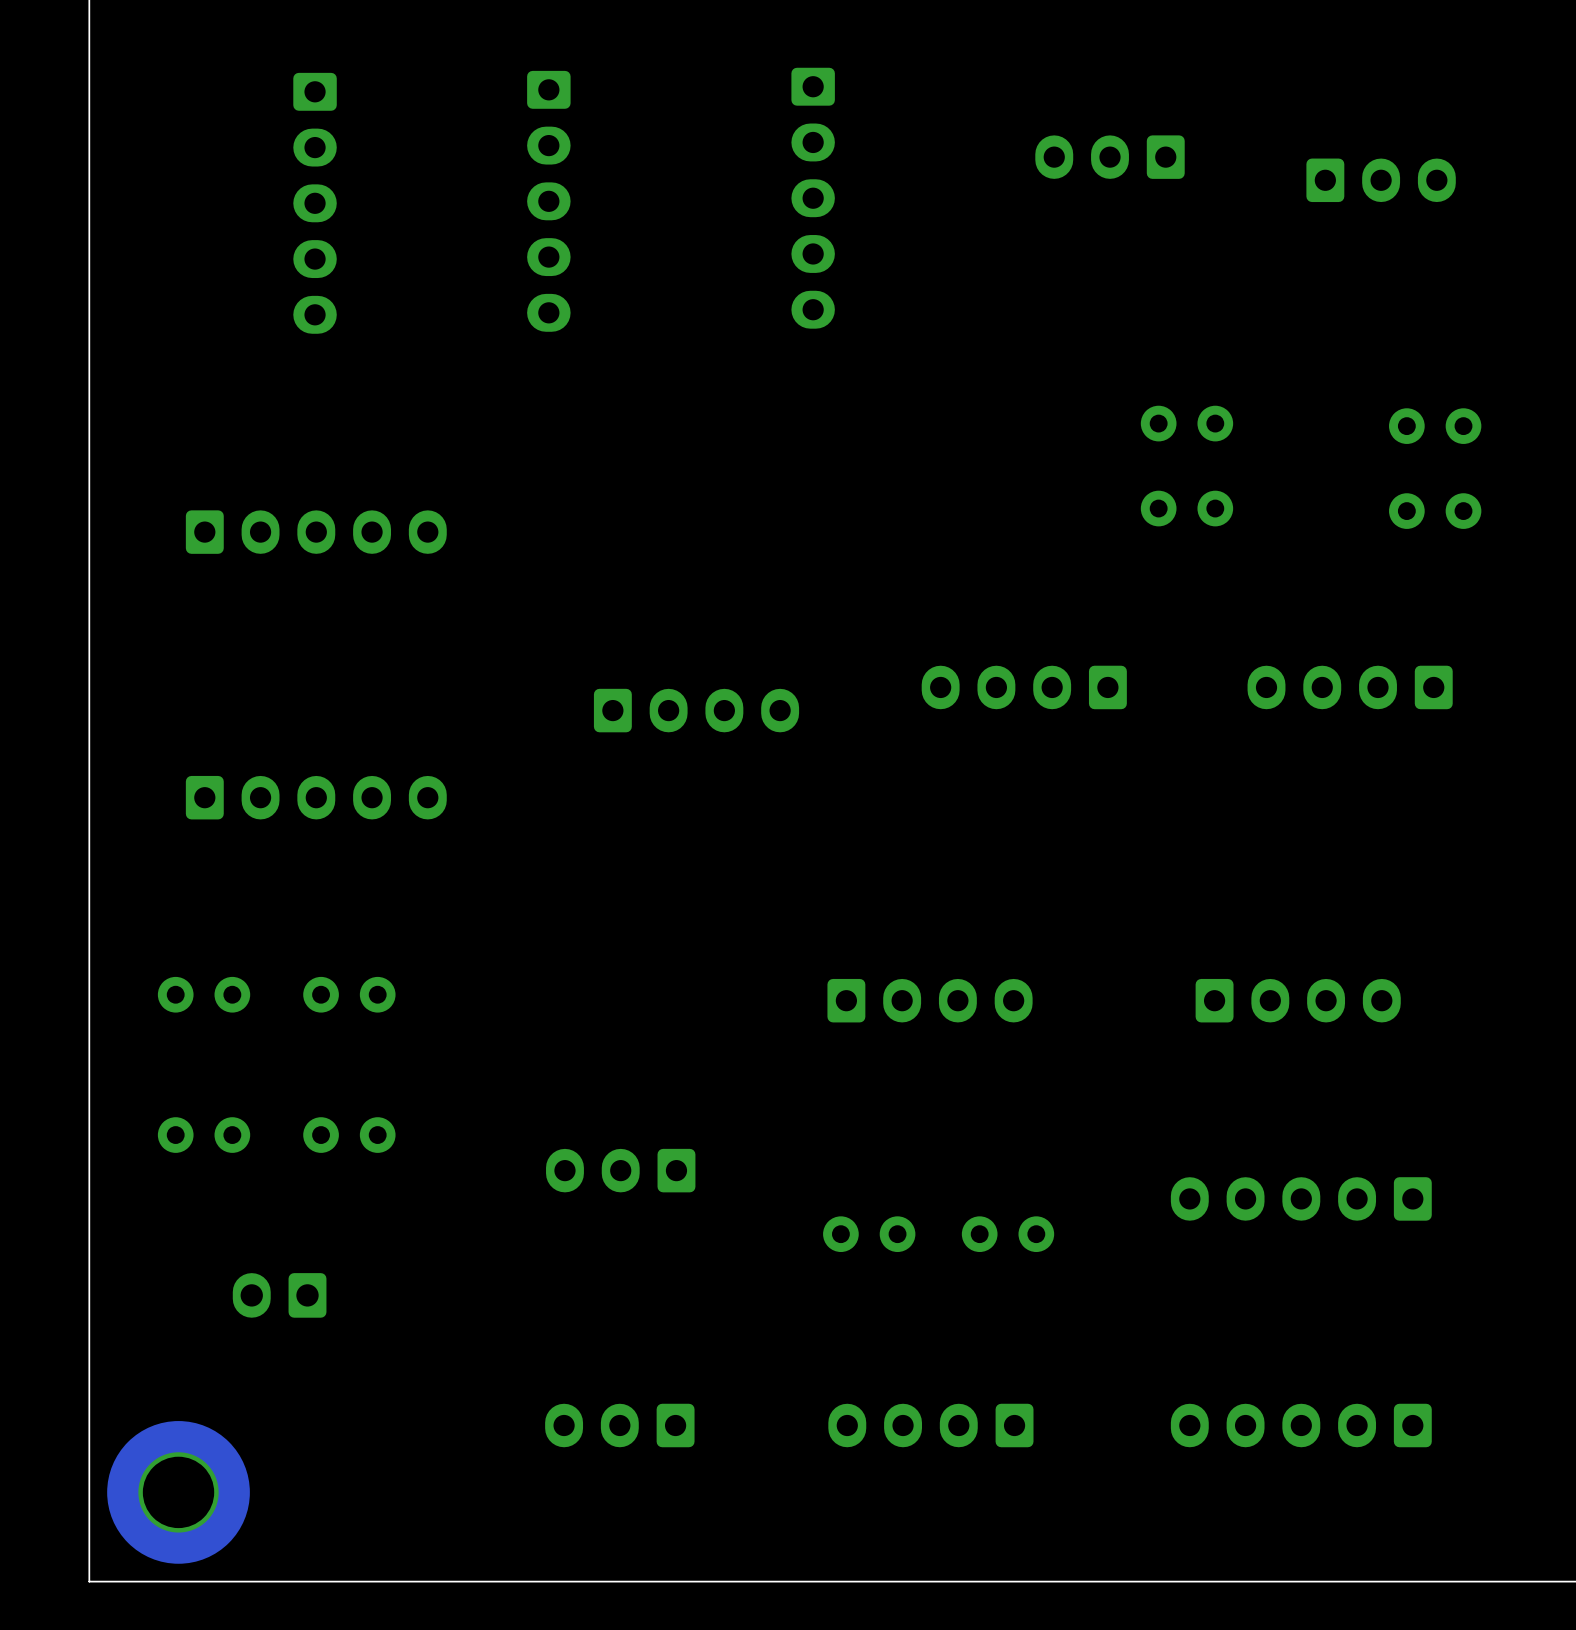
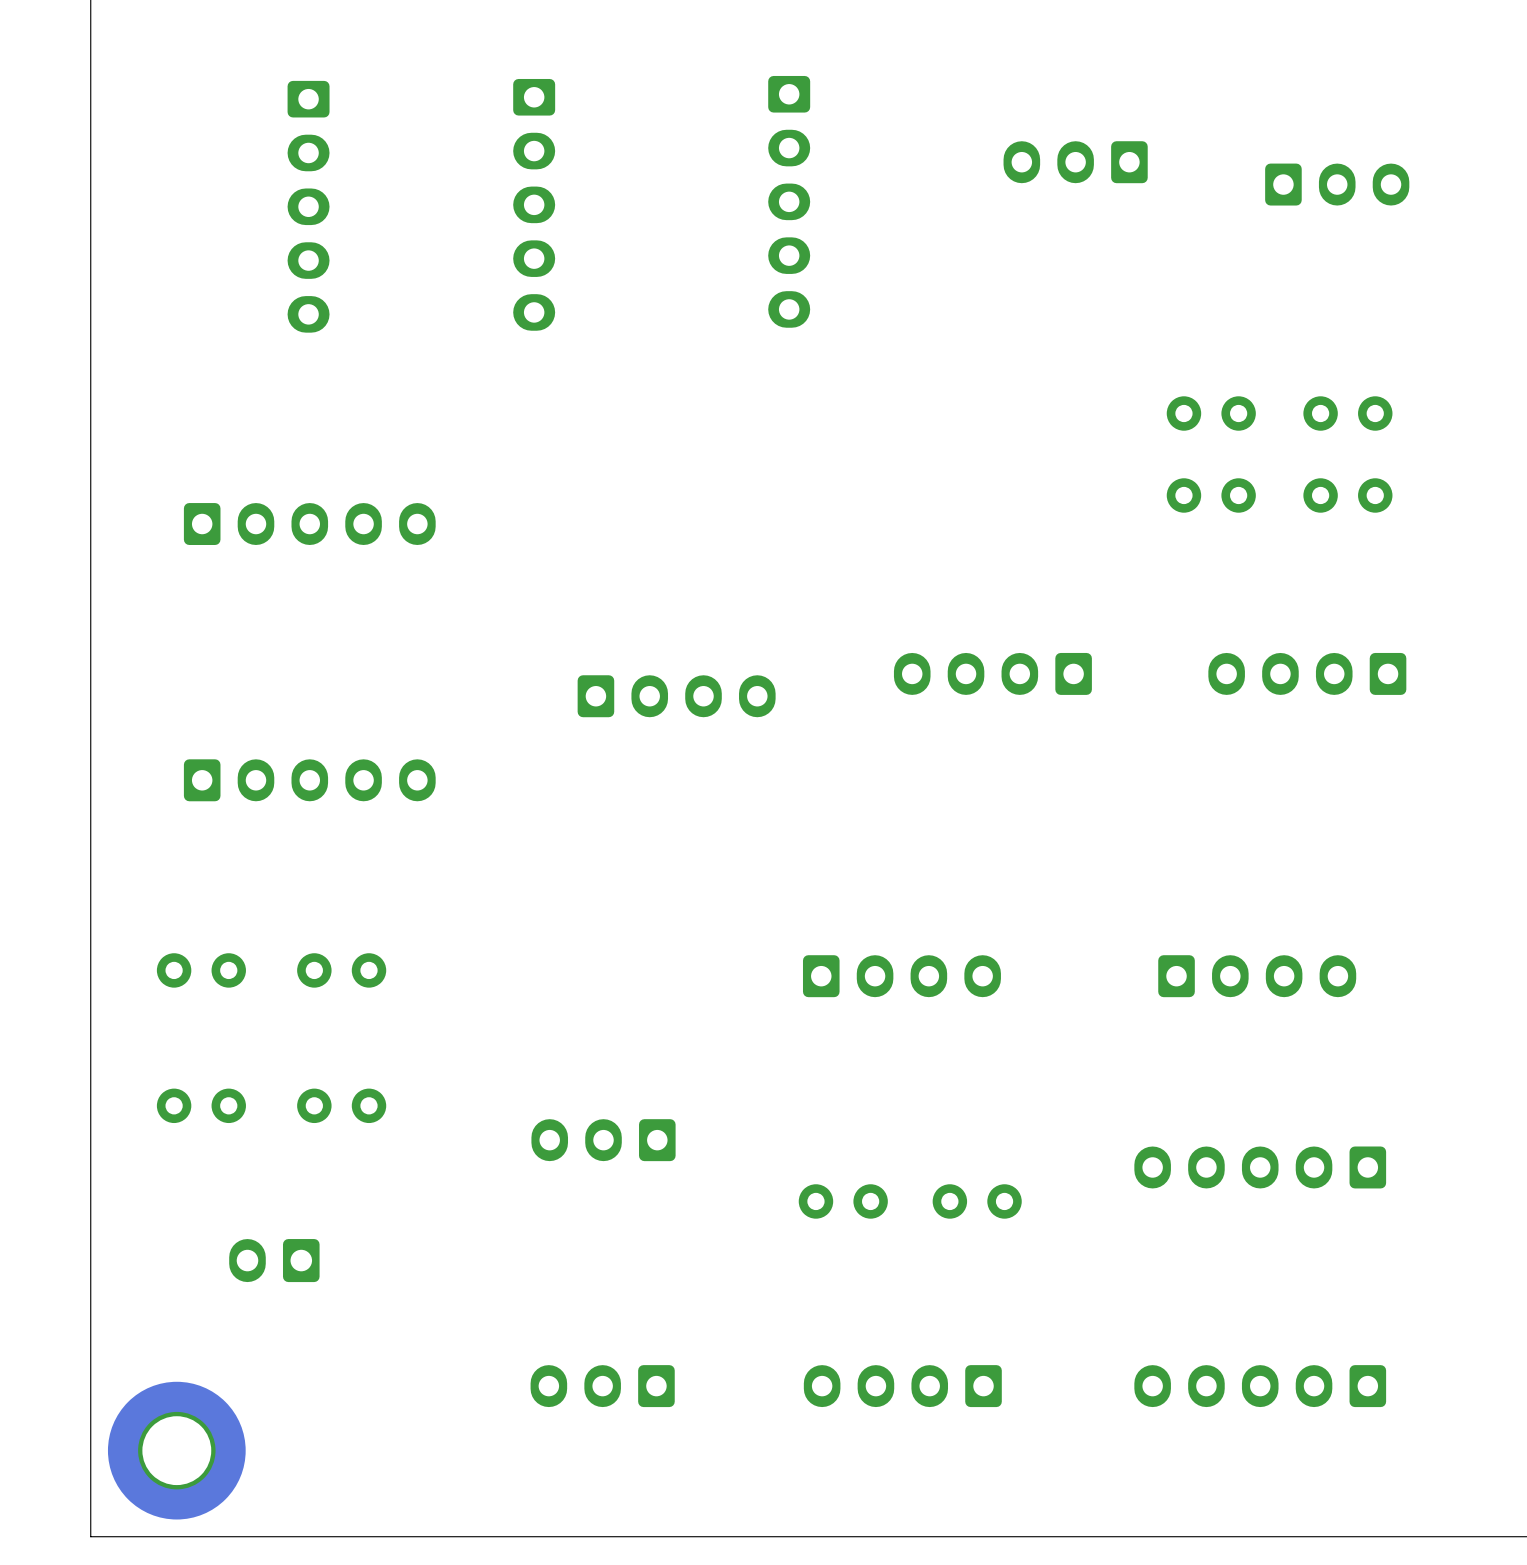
part: none -> (1211, 413)
part: none -> (1347, 413)
part: (1186, 423) -> none
part: (1435, 426) -> none
part: none -> (1211, 495)
part: none -> (1347, 495)
part: (1186, 508) -> none
part: (1435, 511) -> none

